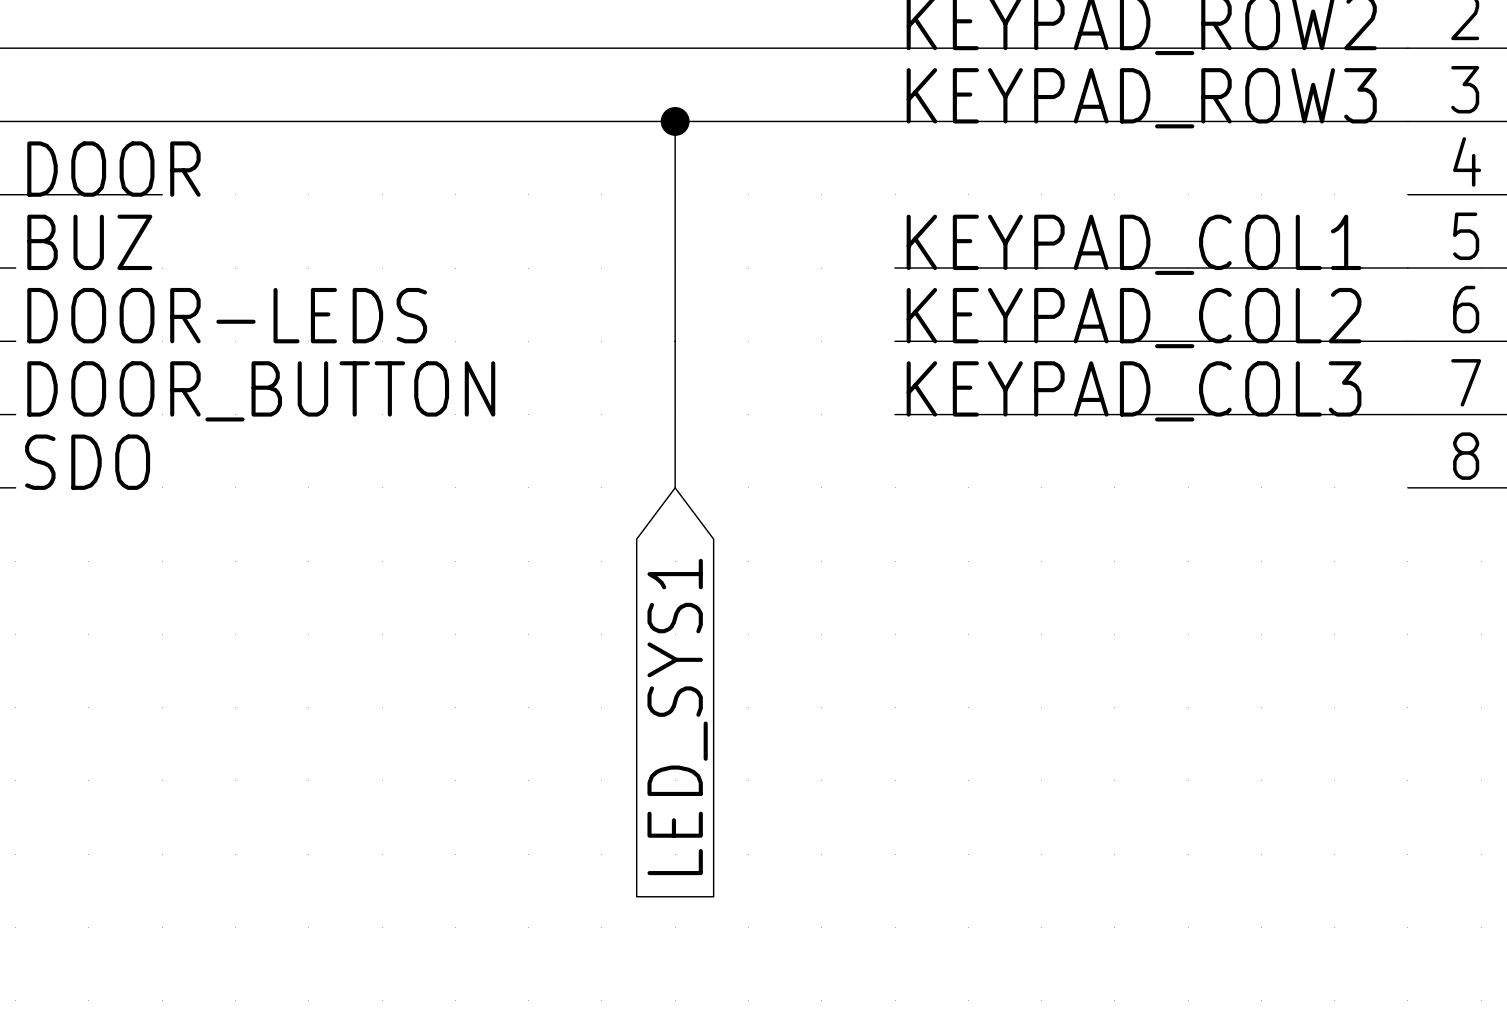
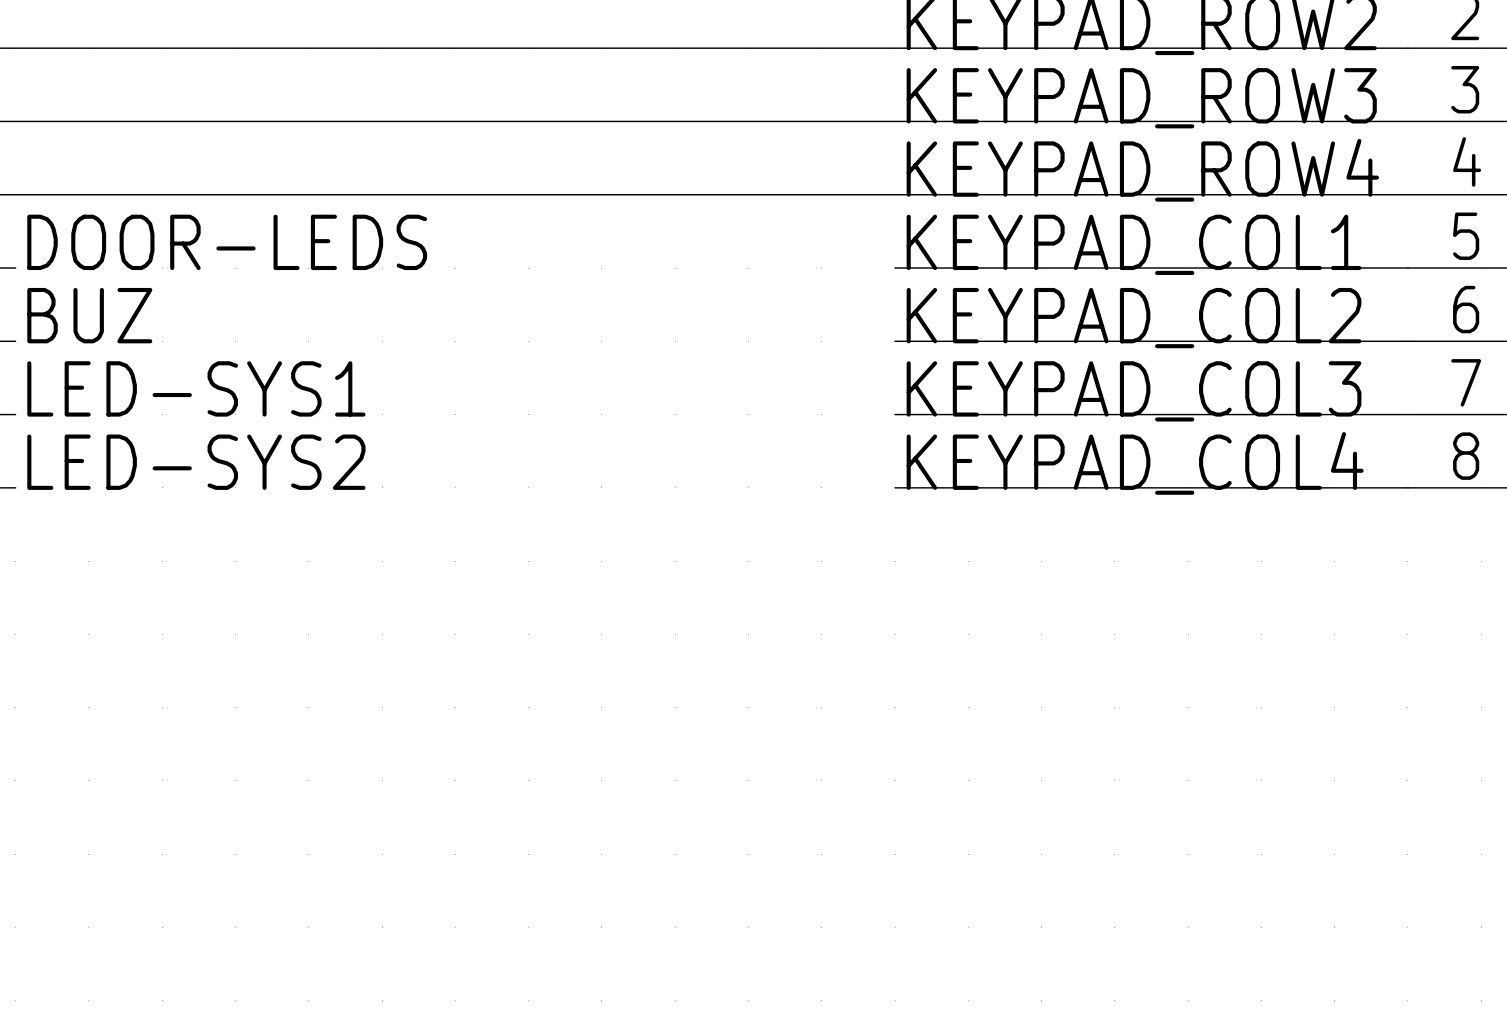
wire: (675, 121) (675, 487) -> none
junction: (675, 121) -> none
label: DOOR (113, 169) -> none
label: none -> KEYPAD_ROW4 (1142, 170)
wire: none -> (162, 194) (1407, 194)
label: BUZ (89, 242) -> DOOR-LEDS (227, 242)
label: DOOR-LEDS (227, 315) -> BUZ (89, 315)
label: DOOR_BUTTON (261, 391) -> LED-SYS1 (196, 388)
label: SDO (87, 462) -> LED-SYS2 (196, 462)
label: none -> KEYPAD_COL4 (1135, 463)
wire: none -> (895, 487) (1407, 487)
global label: LED_SYS1 (677, 716) -> none

